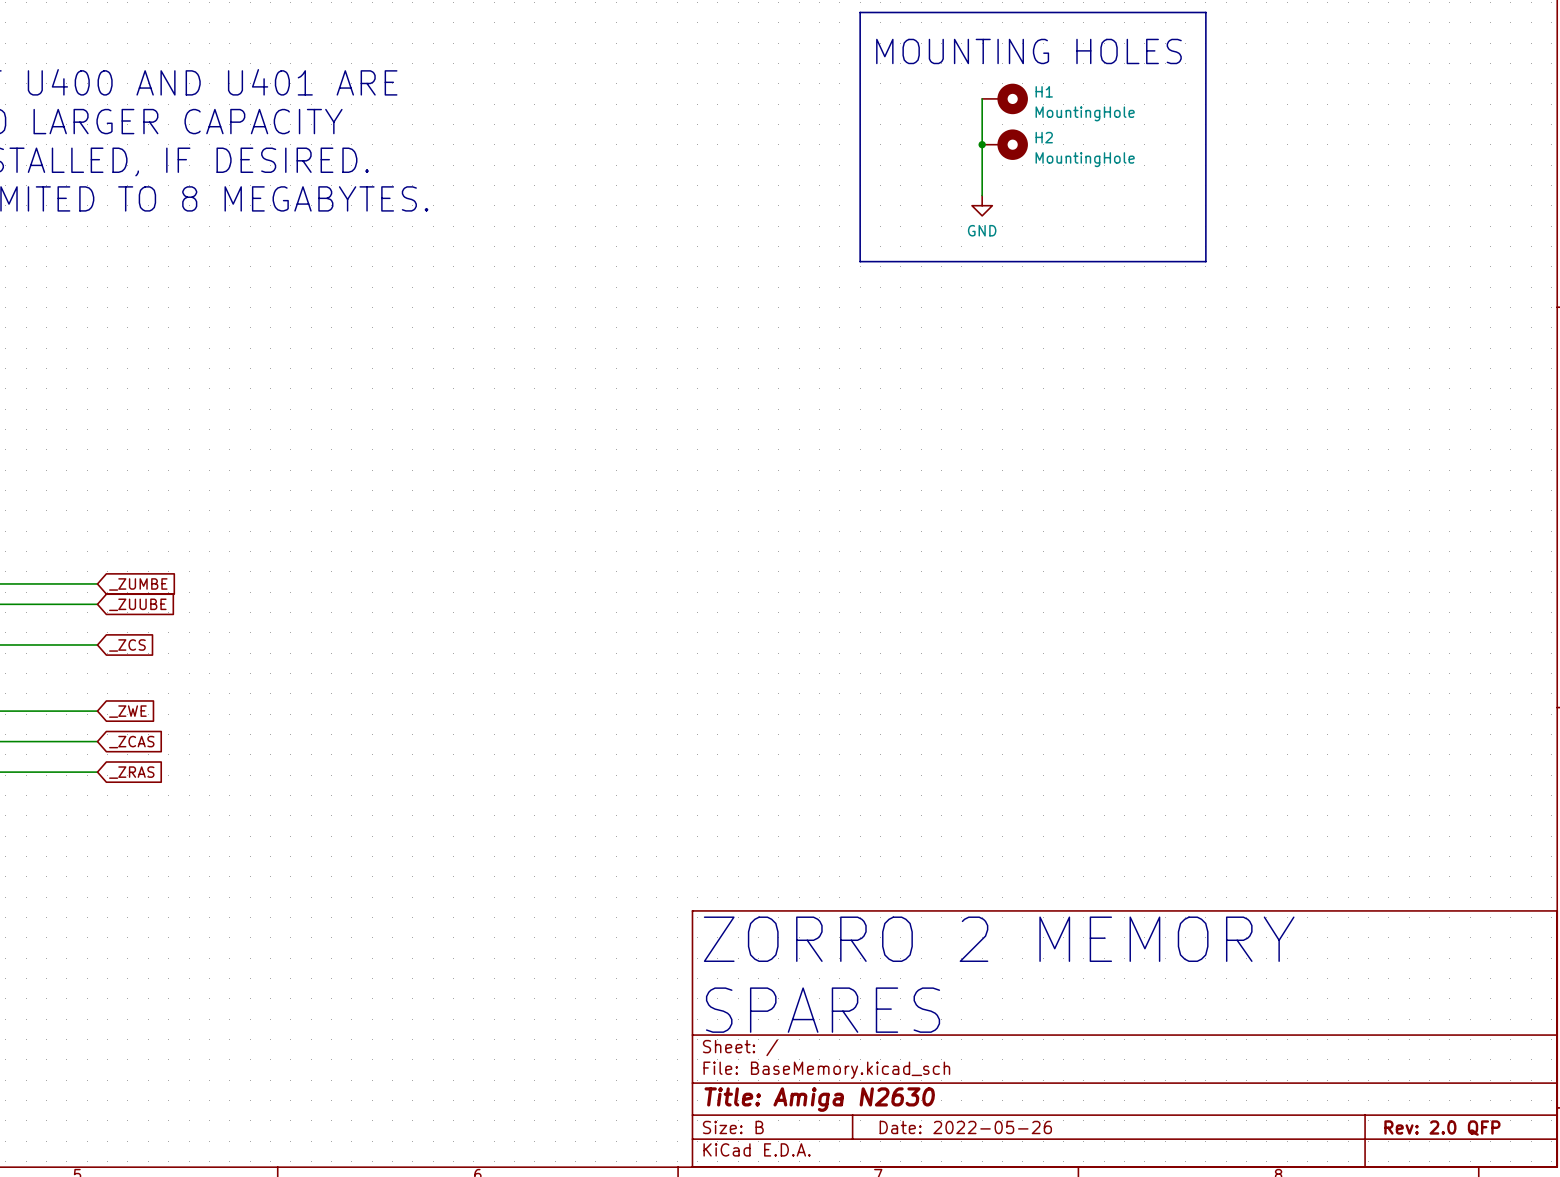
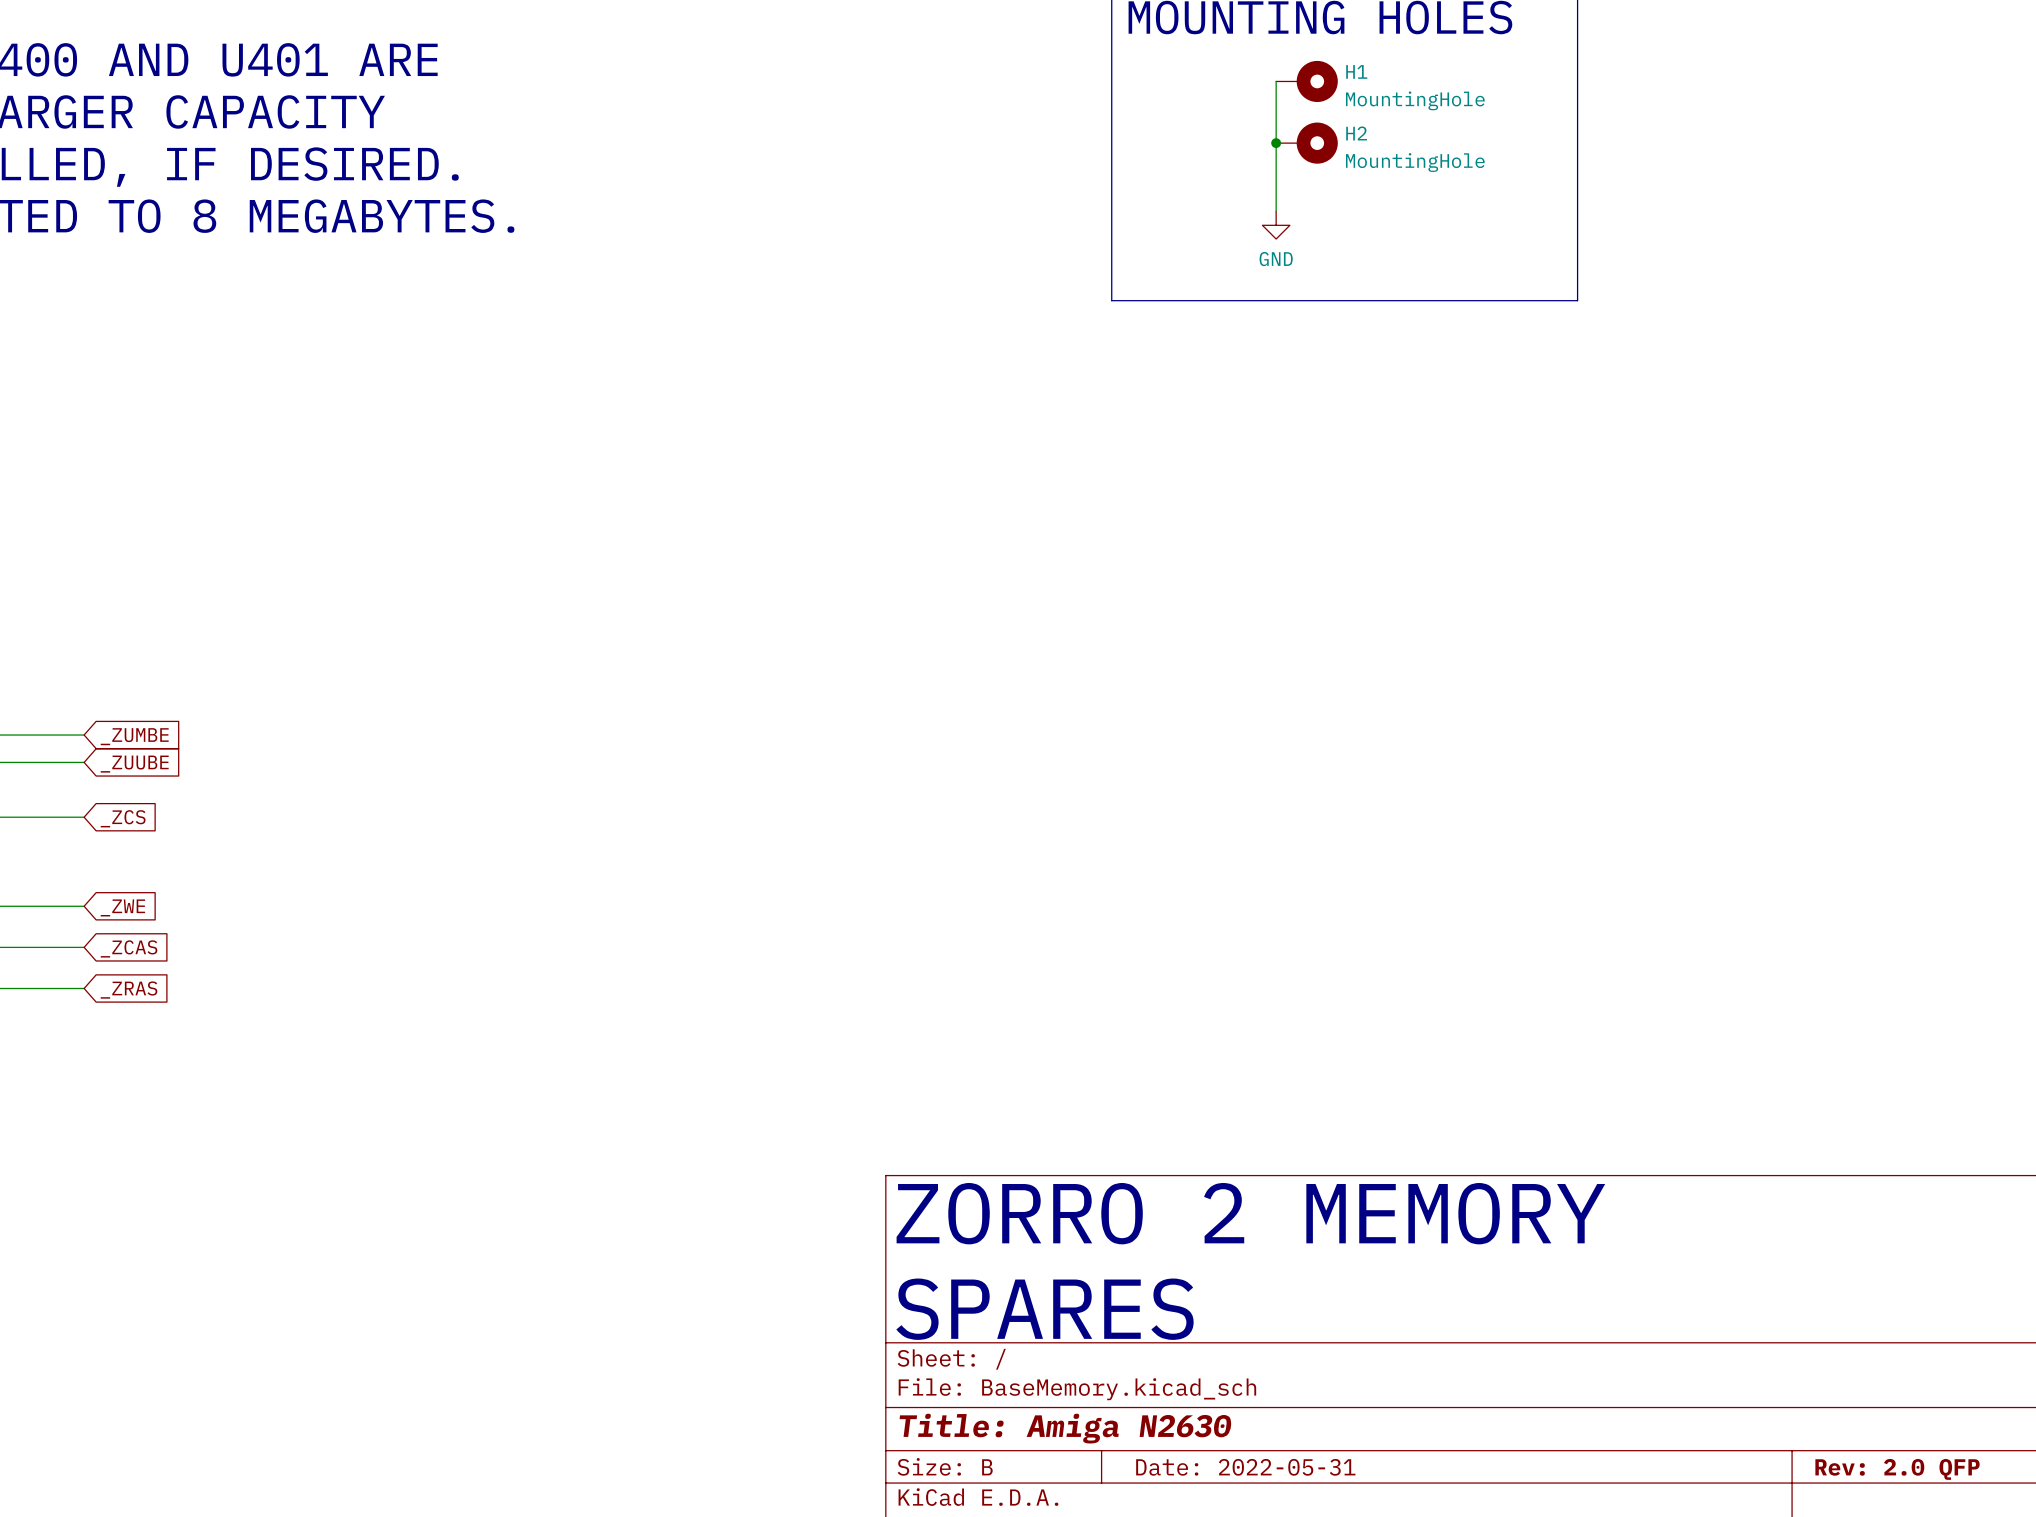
title block: Date: 2022-05-26 (965, 1127) -> Date: 2022-05-31 (1245, 1467)

